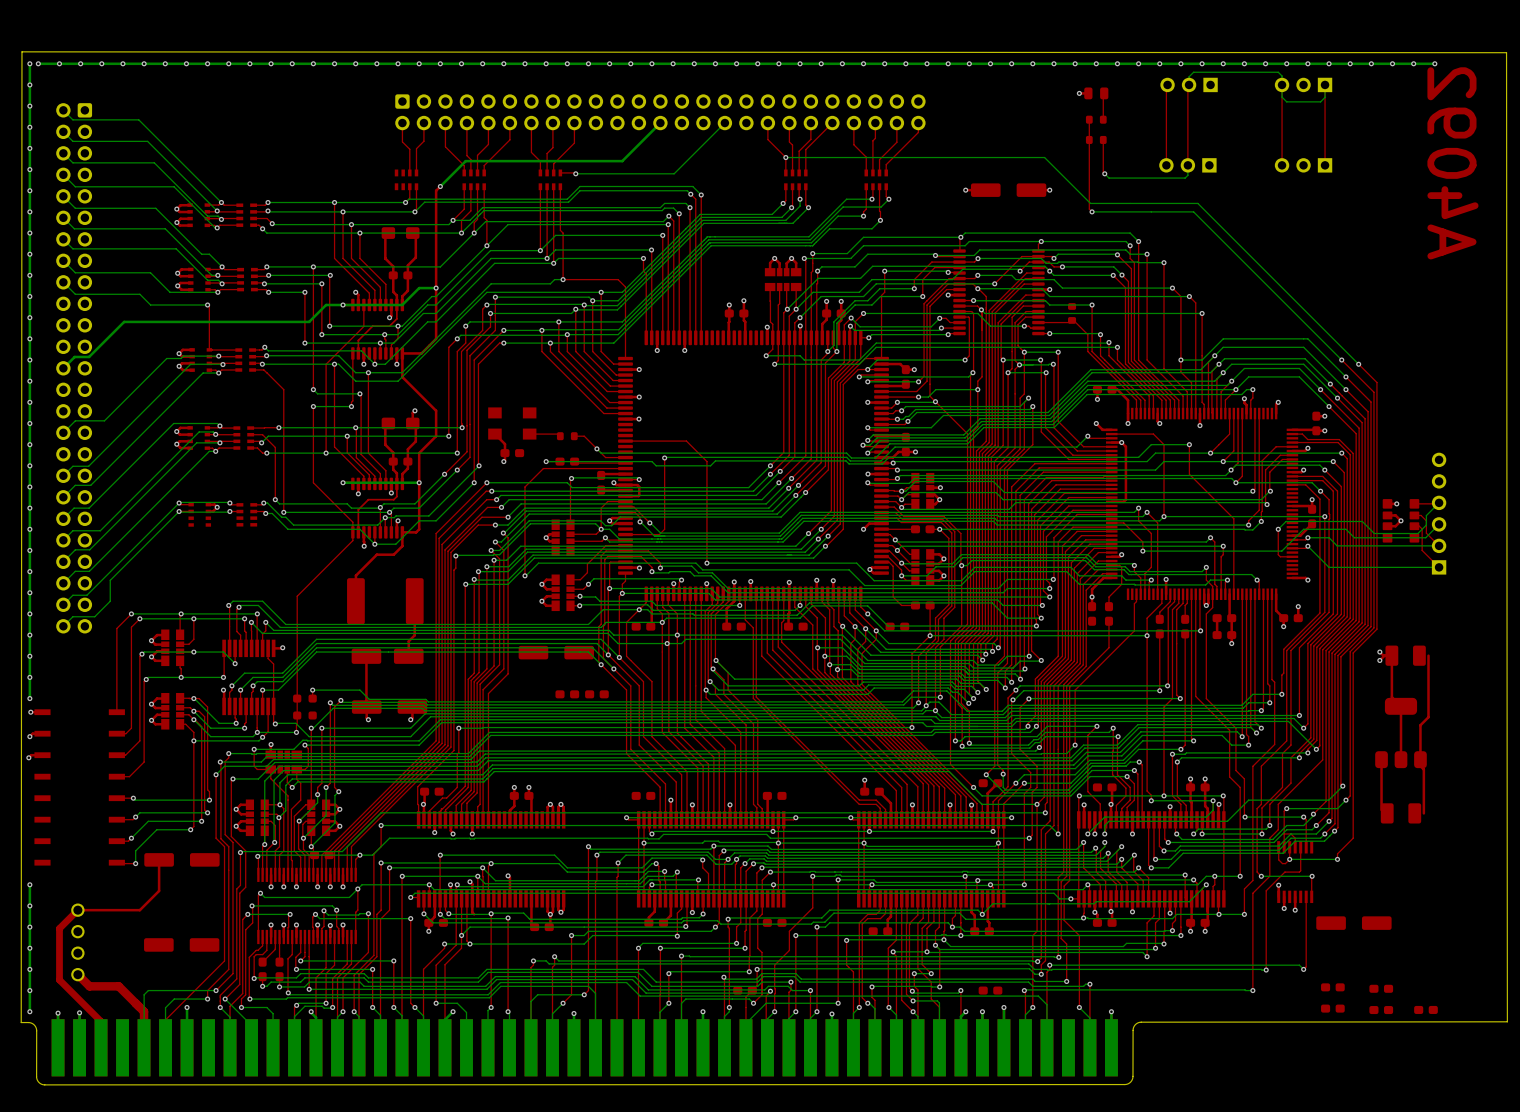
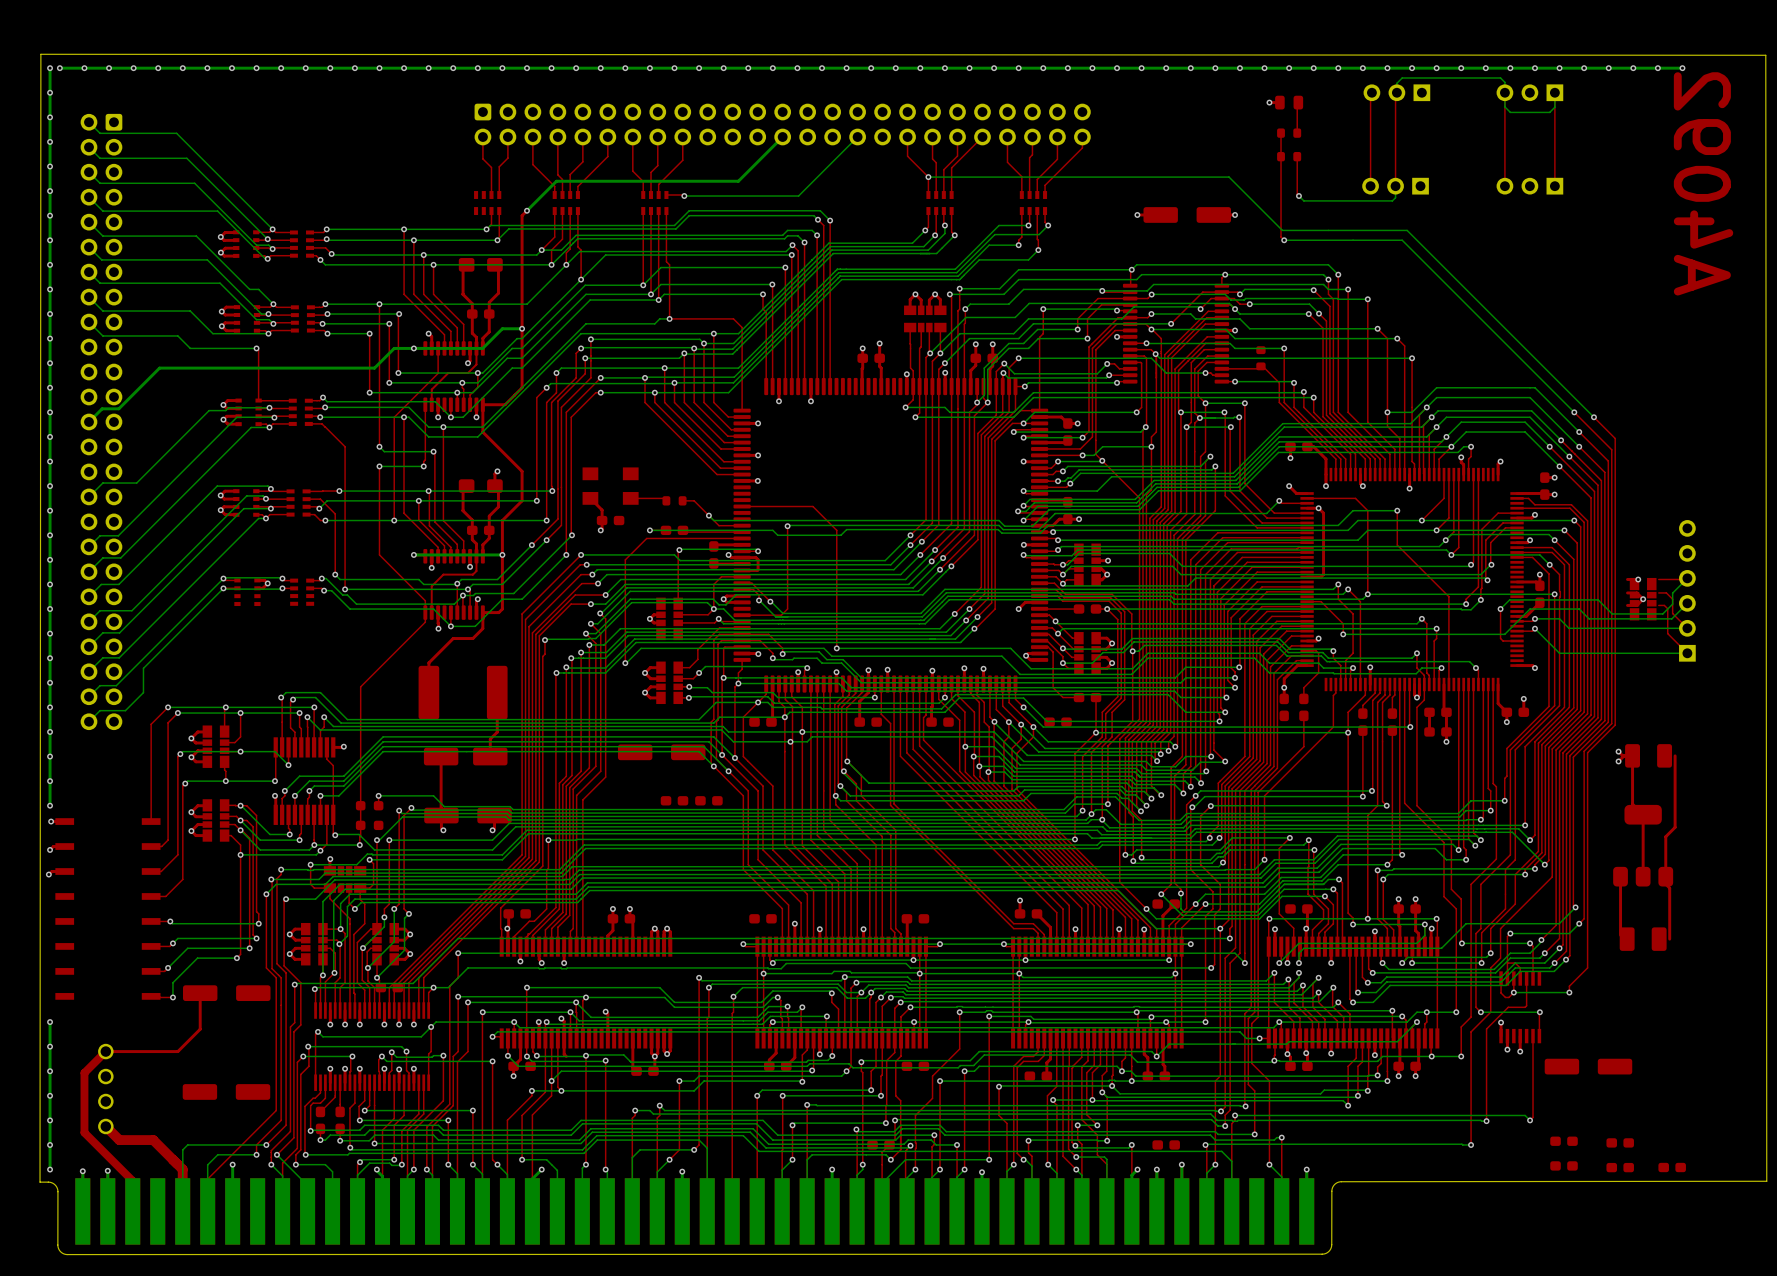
part footprint: [1382, 499, 1420, 543] -> [1629, 577, 1657, 621]

